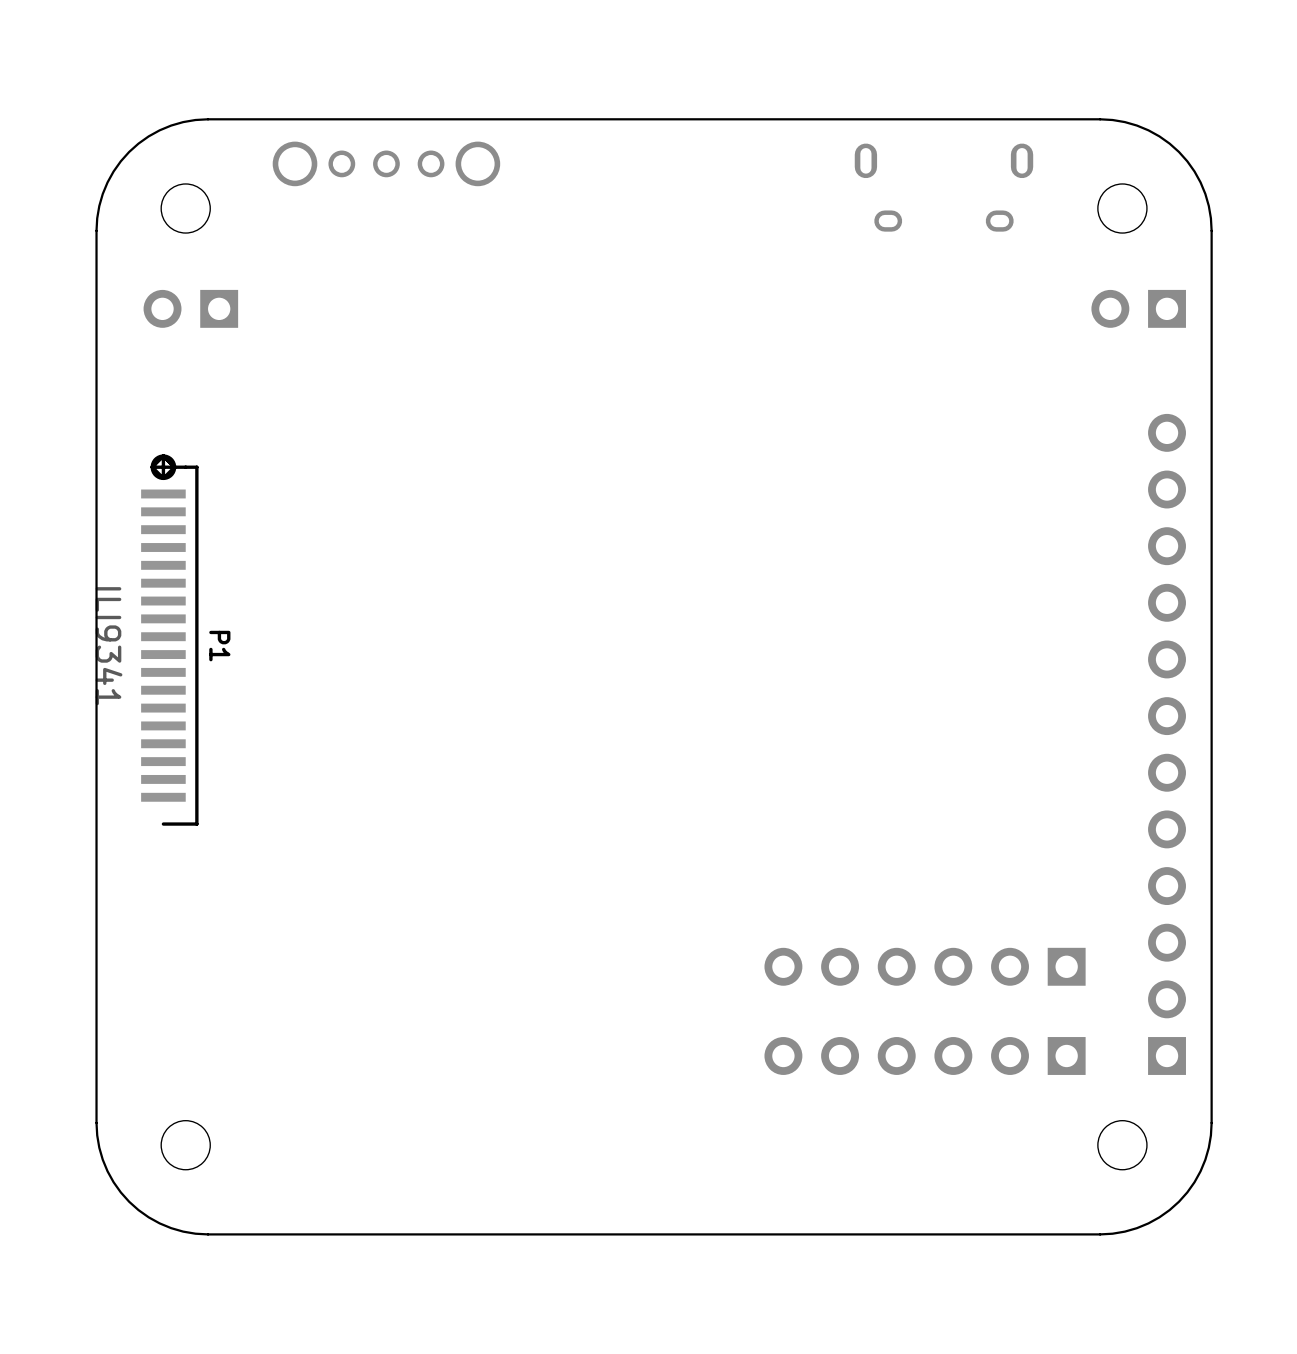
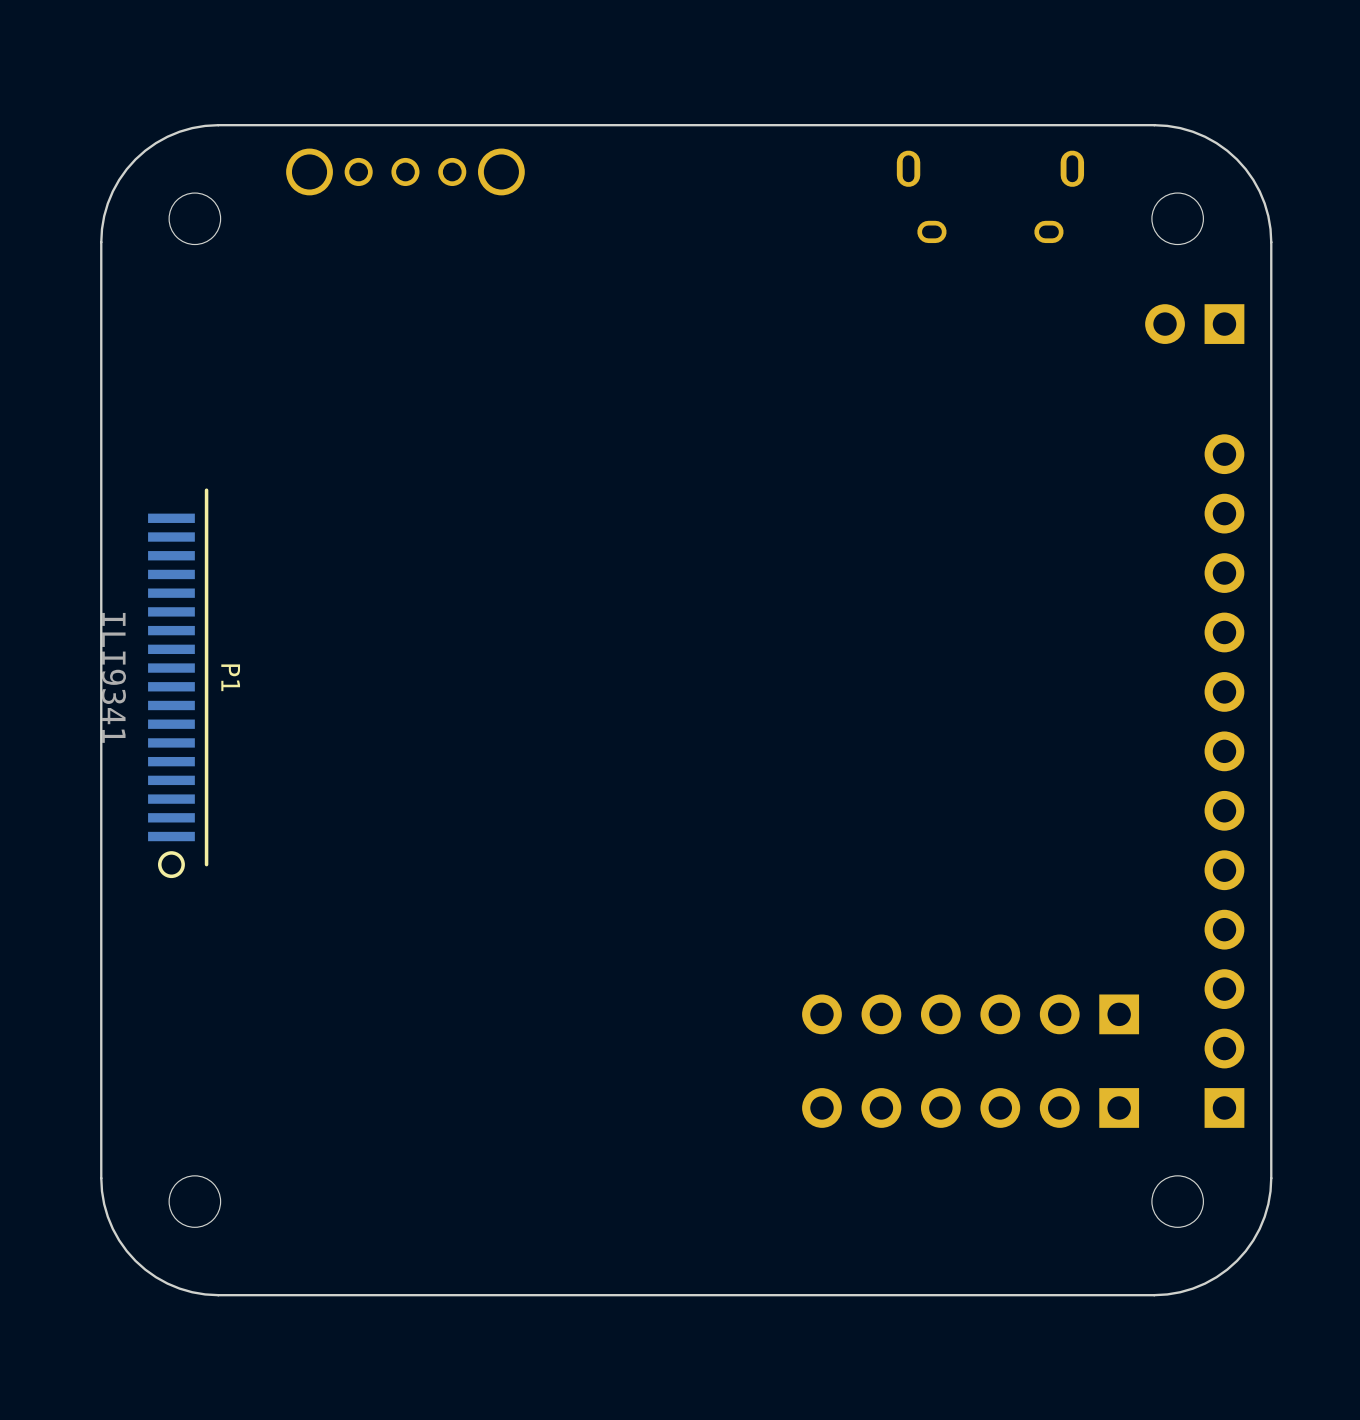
part: (190, 308) -> none
P1 footprint: [141, 454, 199, 826] -> [148, 488, 209, 879]

